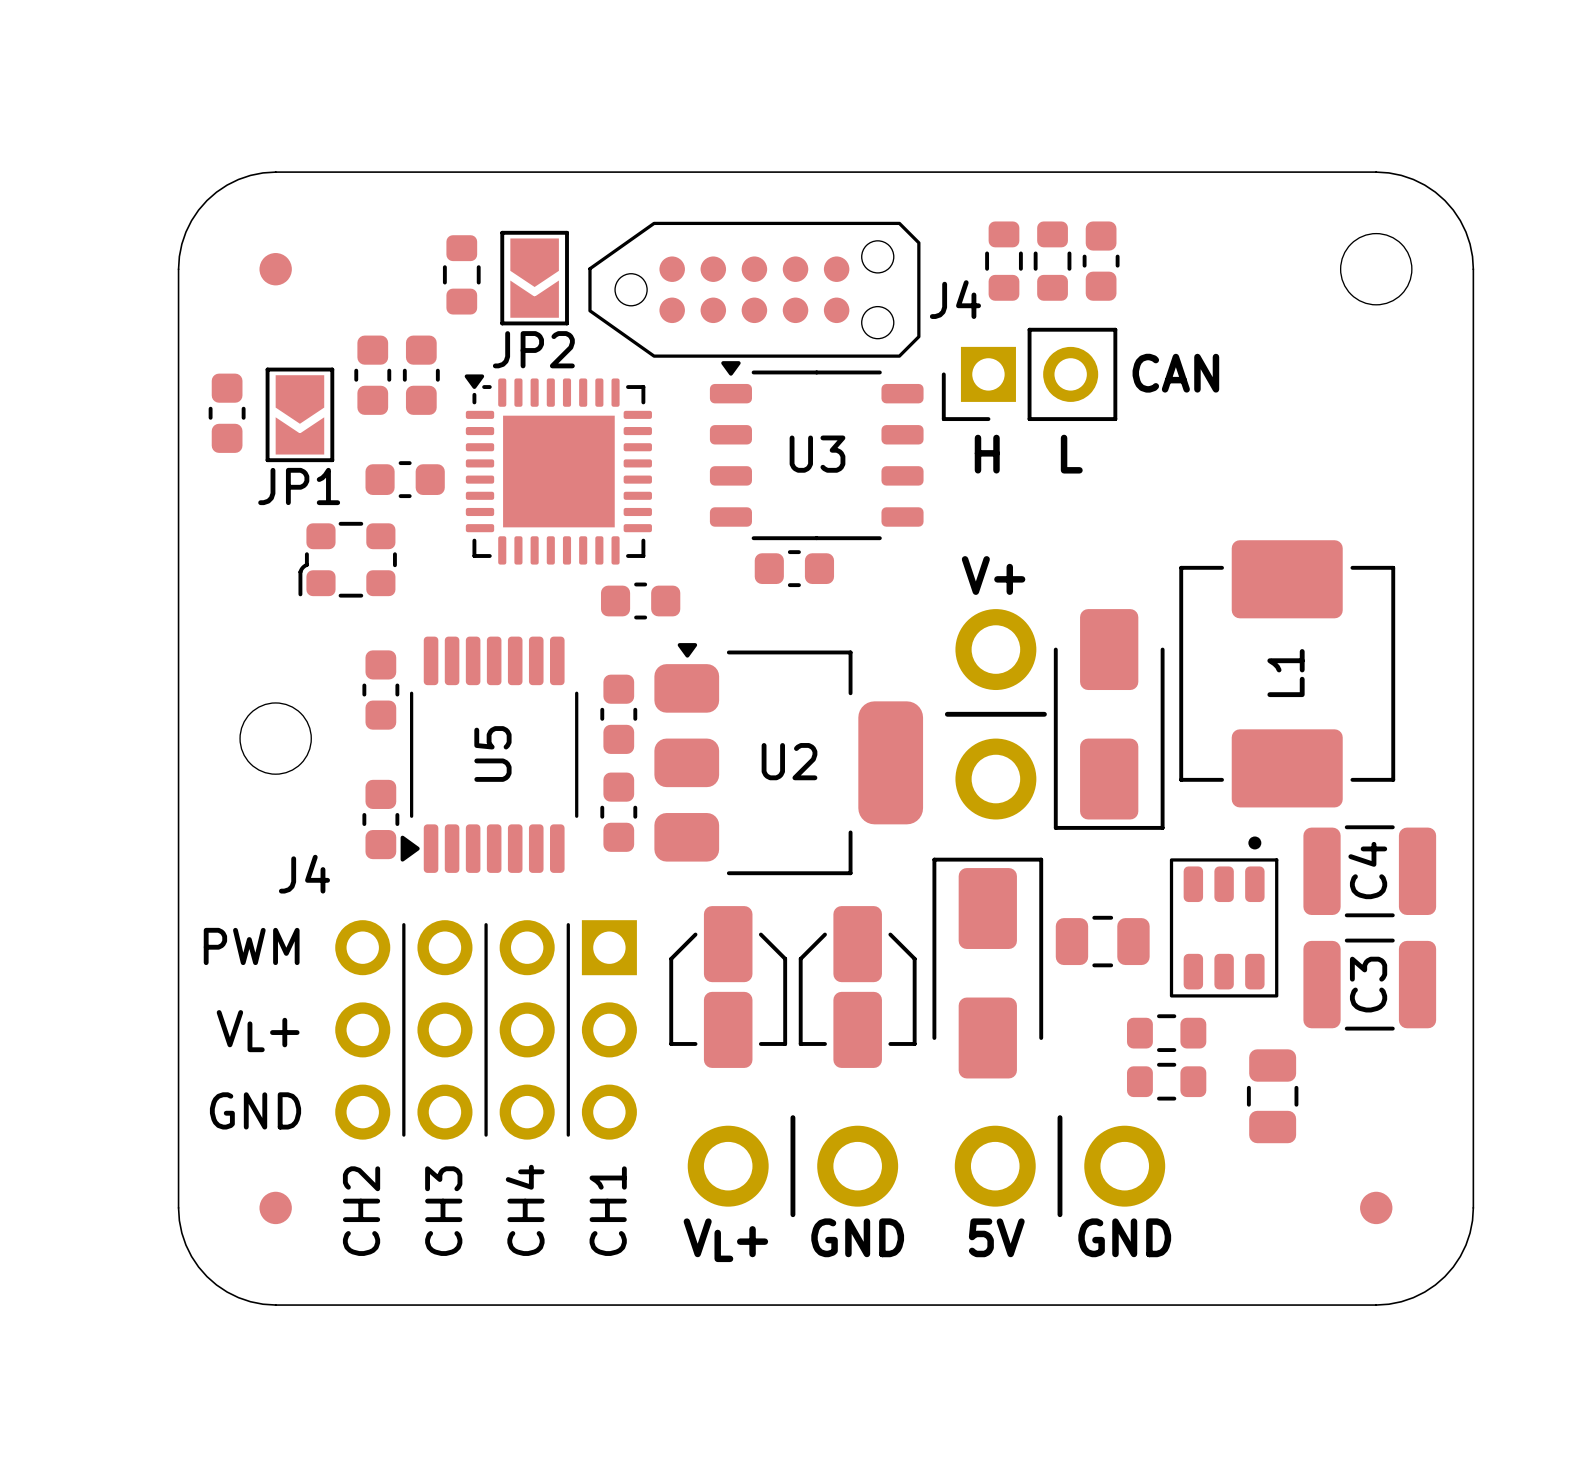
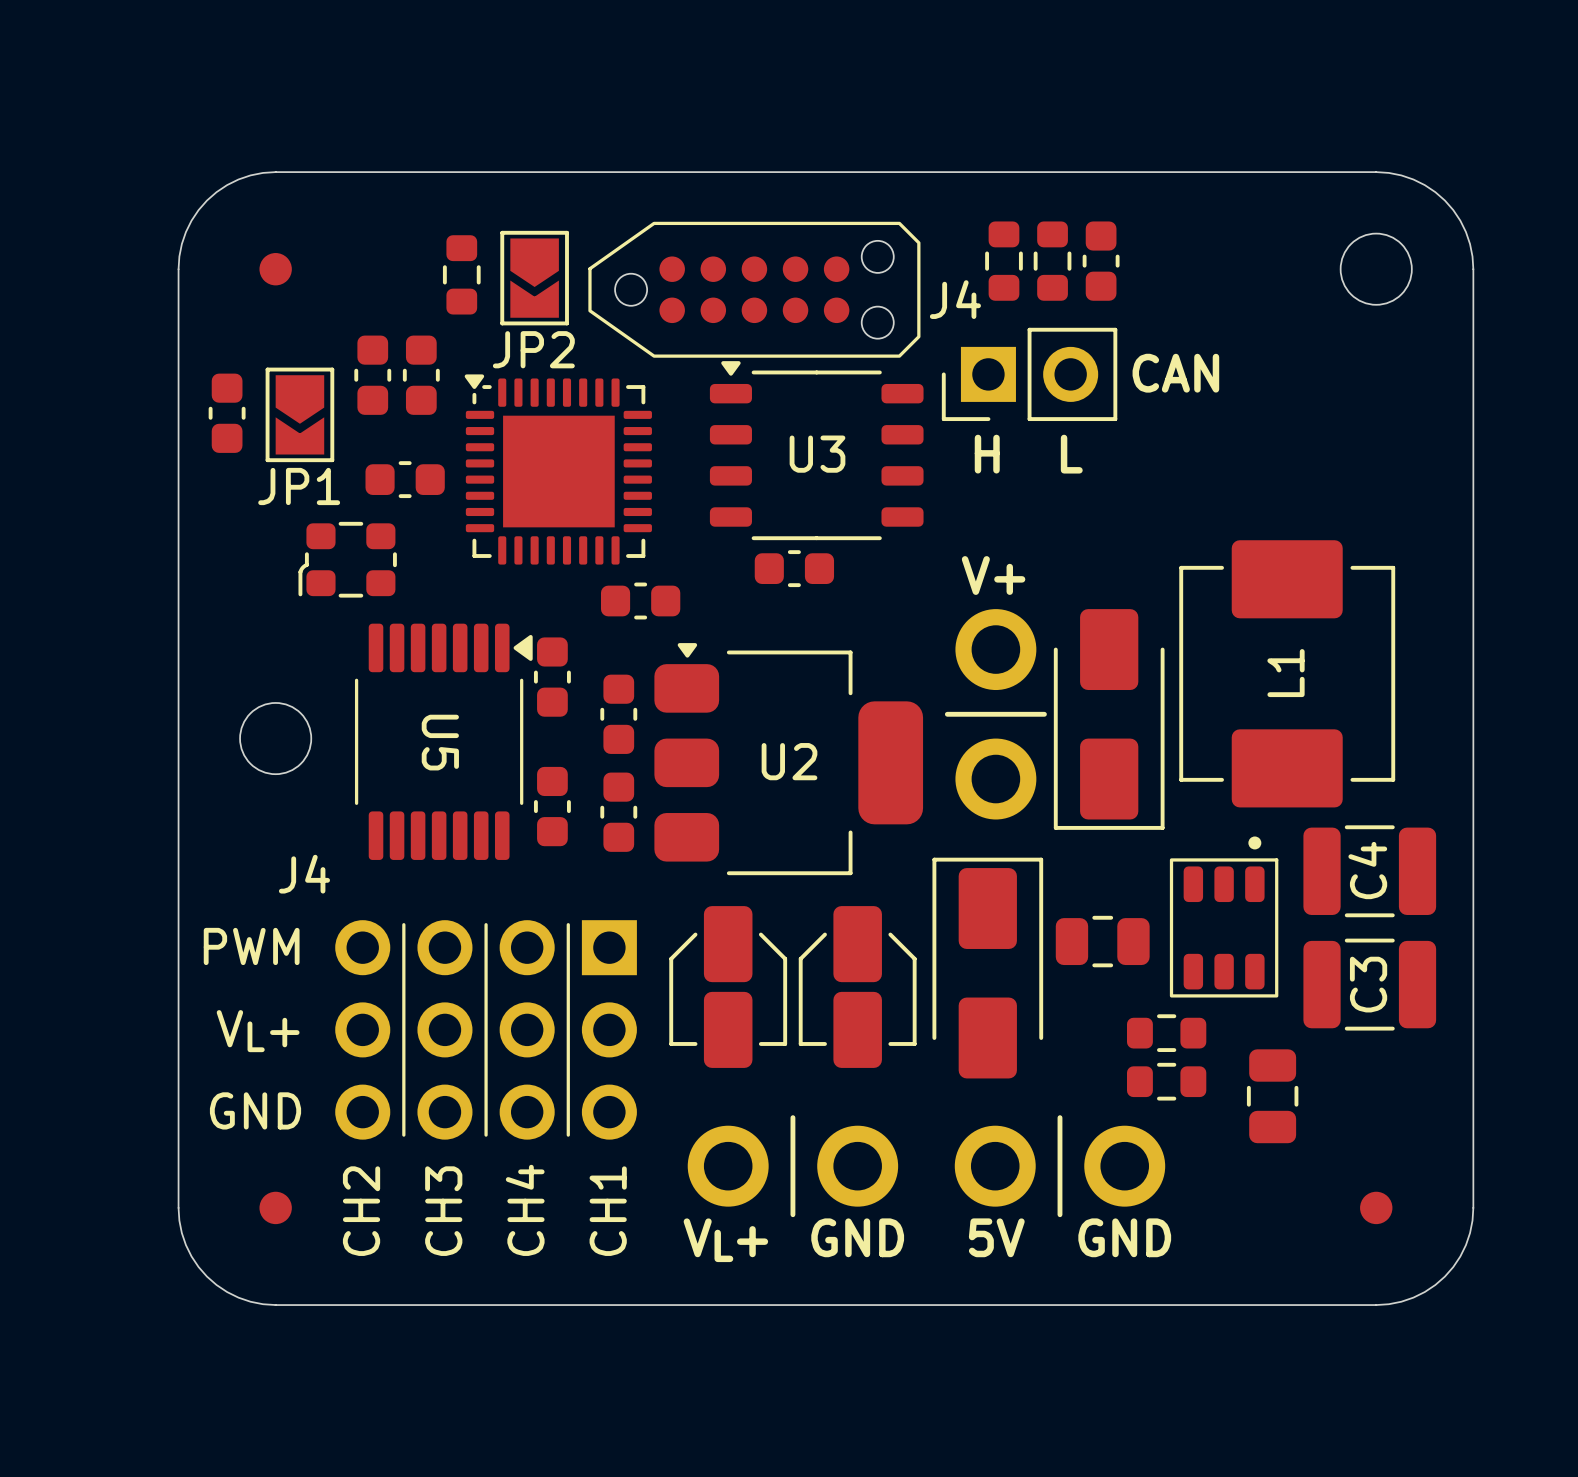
part: none -> (552, 677)
part: (380, 690) -> none
U5 rotation: 0° (489, 754) -> 180° (443, 741)
part: none -> (552, 806)
part: (380, 819) -> none

